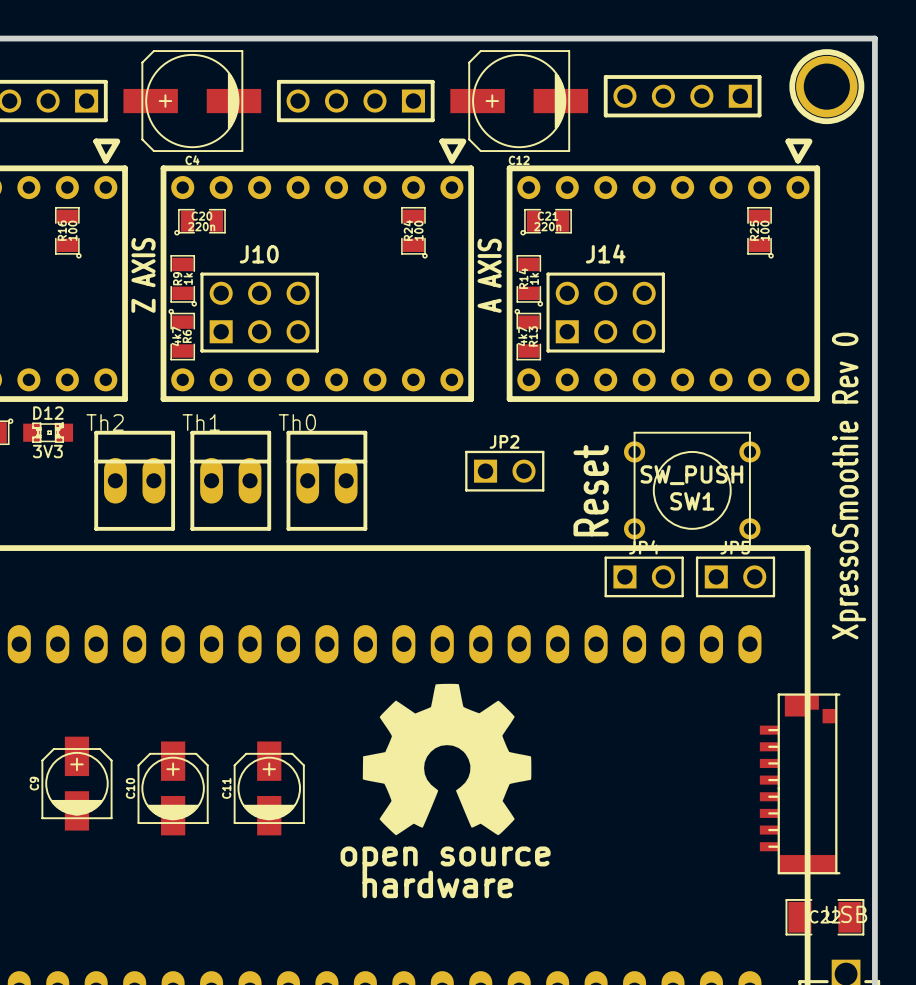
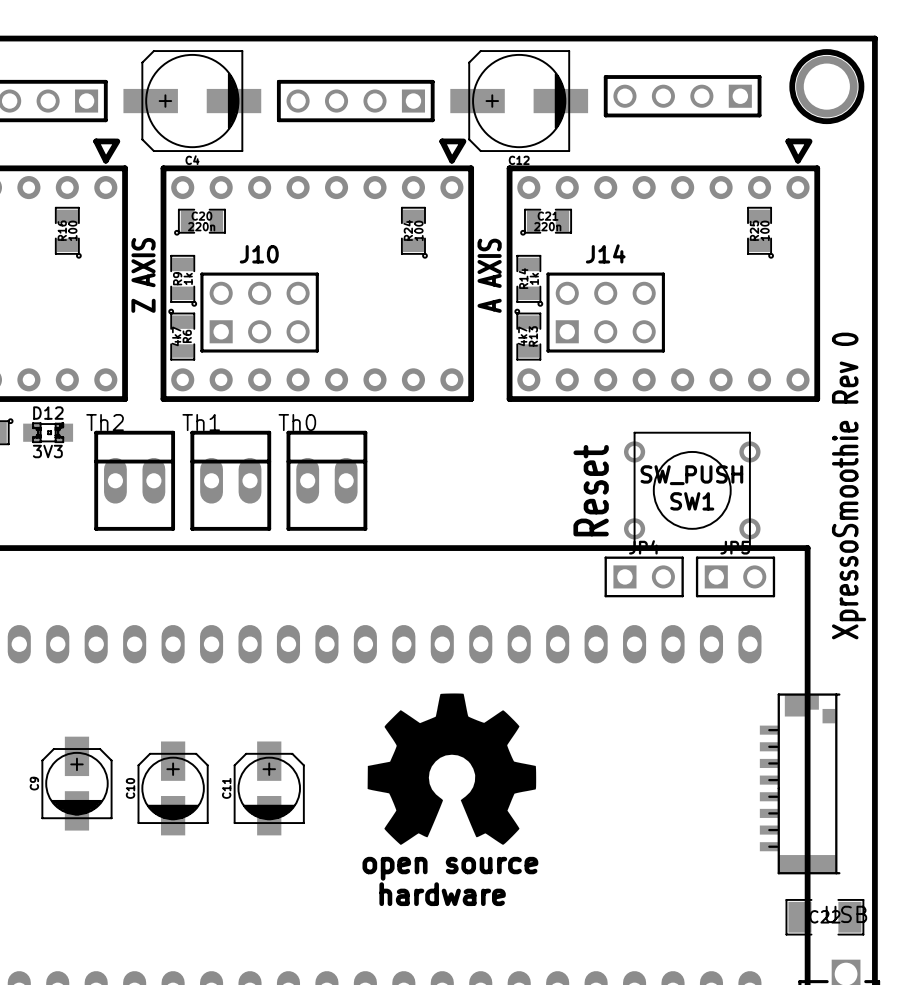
JP2: (504, 471) -> none
drawing shape: [340, 683, 551, 899] -> [362, 693, 539, 907]

